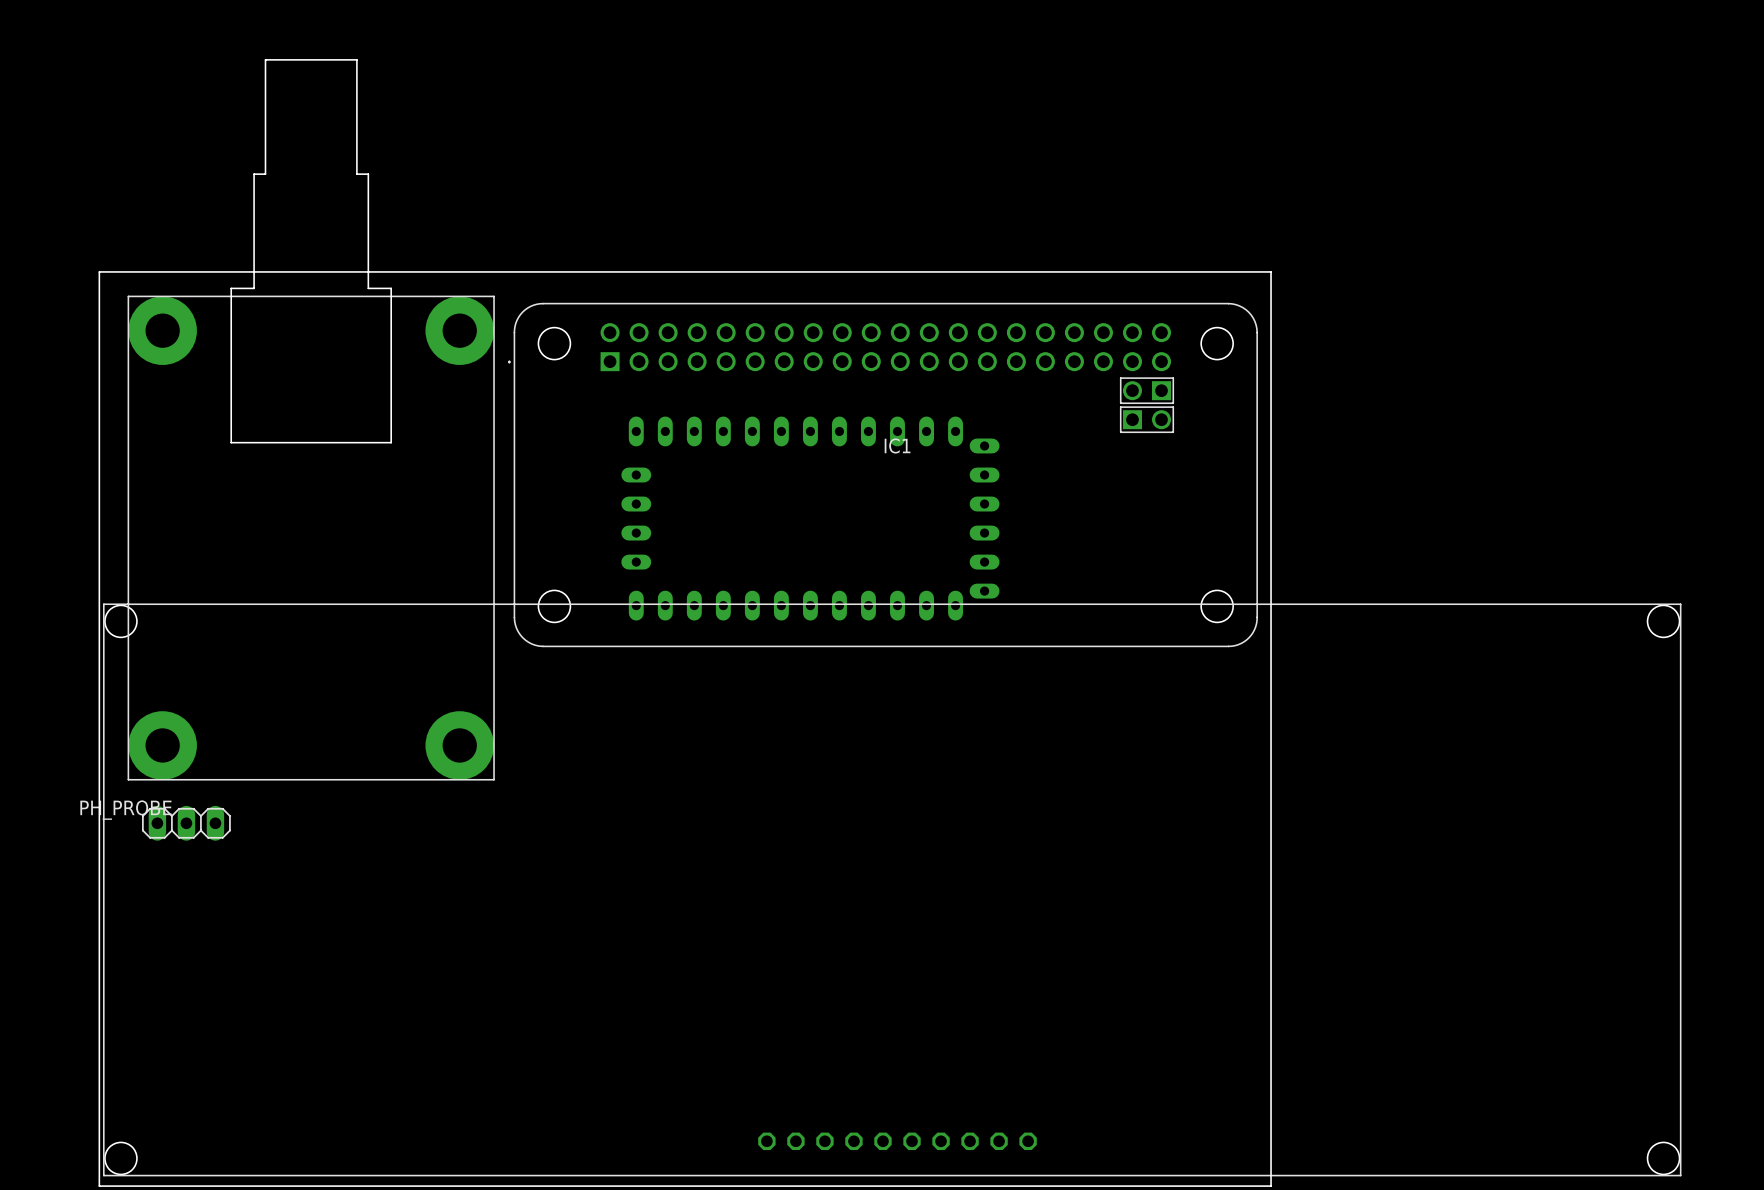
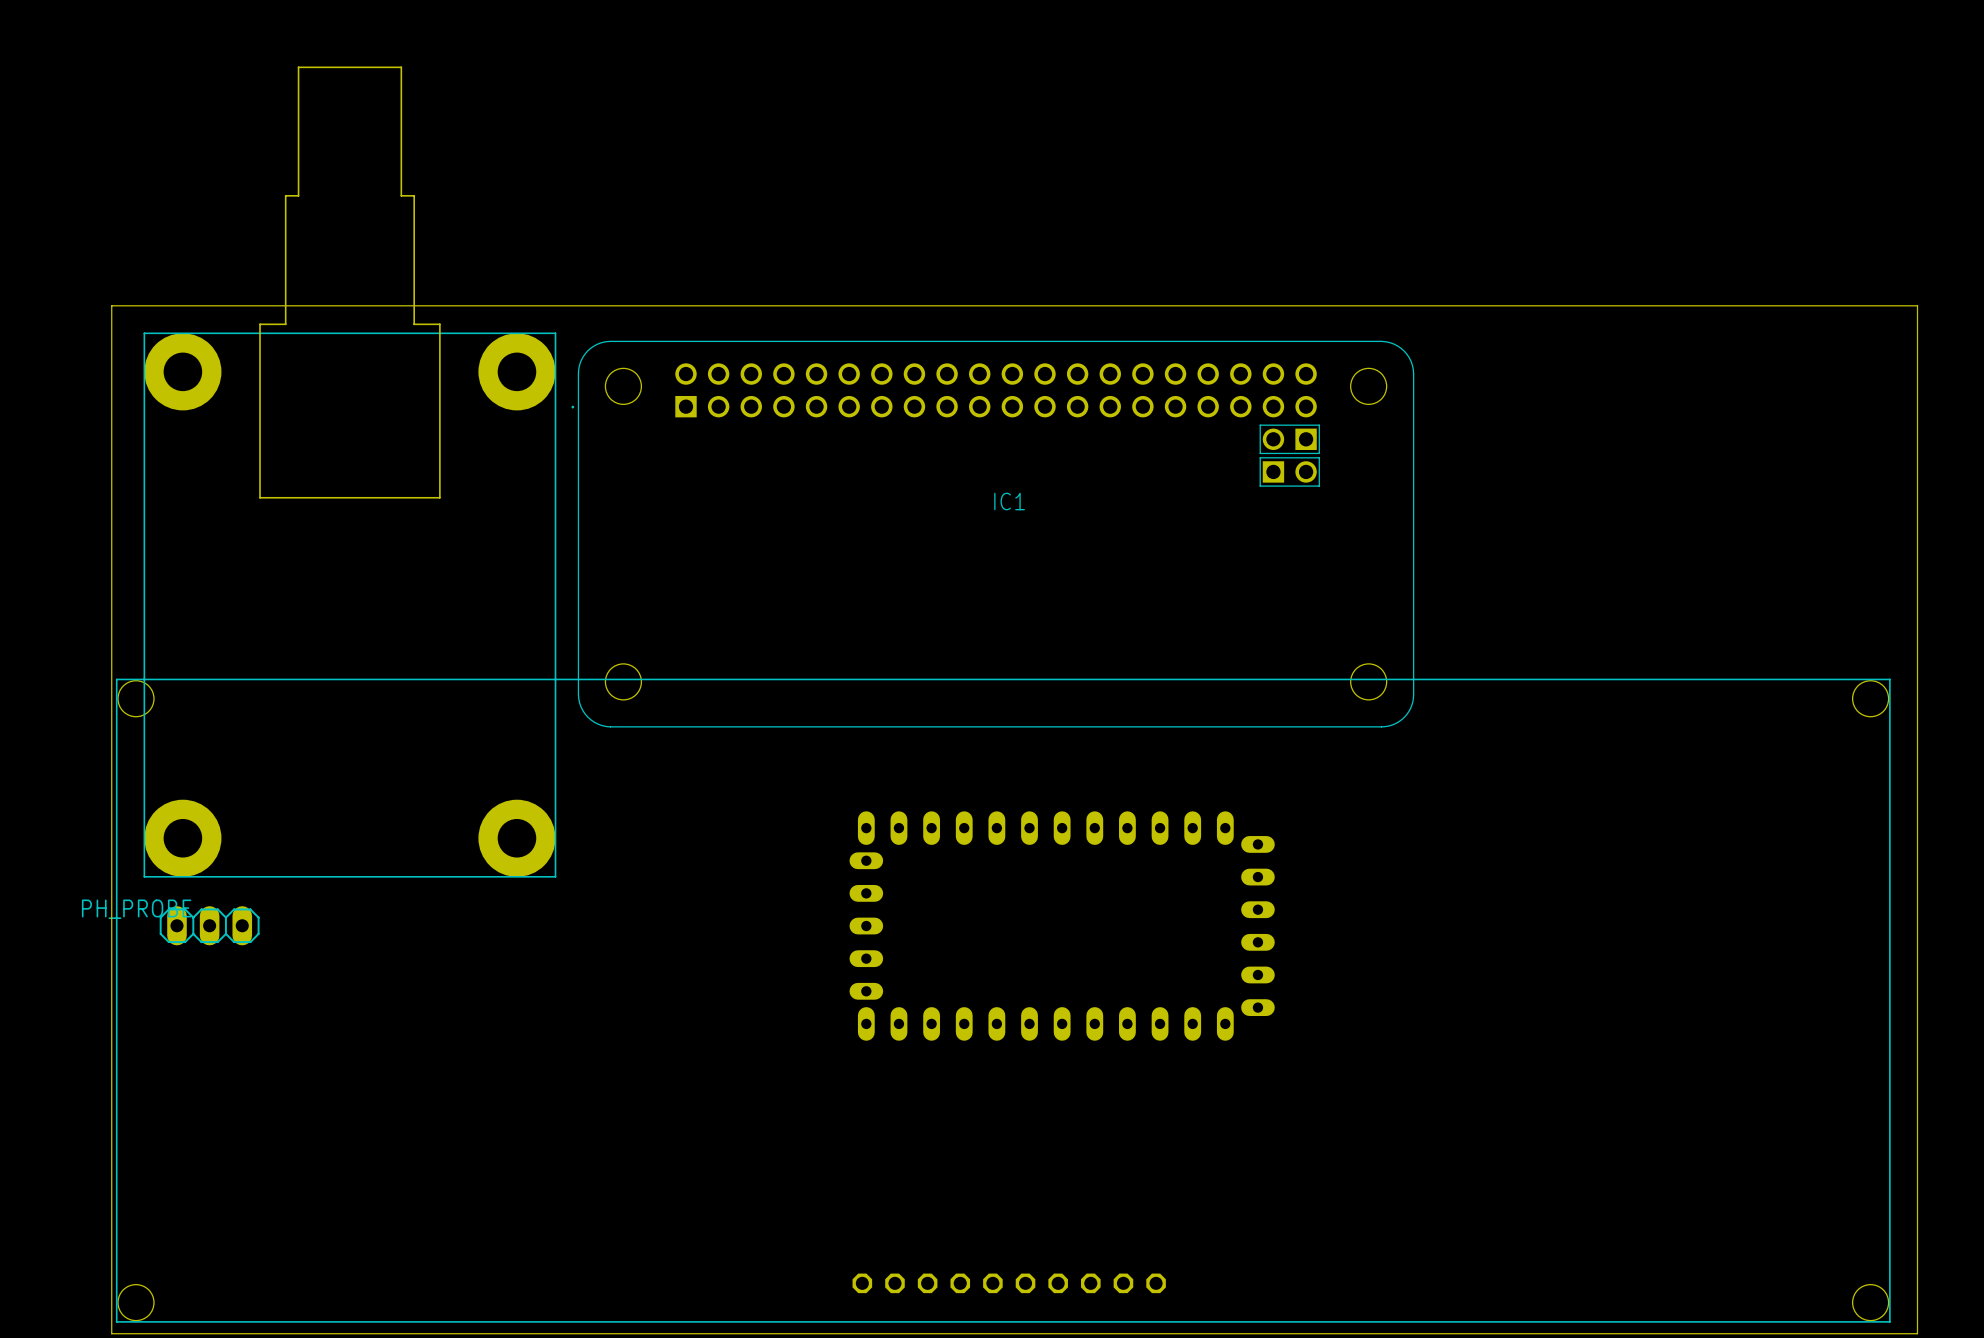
board edge: (1271, 271) (1271, 1186) -> (1429, 305) (1917, 305) (1917, 1333) (1429, 1333)
part: (810, 518) -> none
part: none -> (1062, 926)

